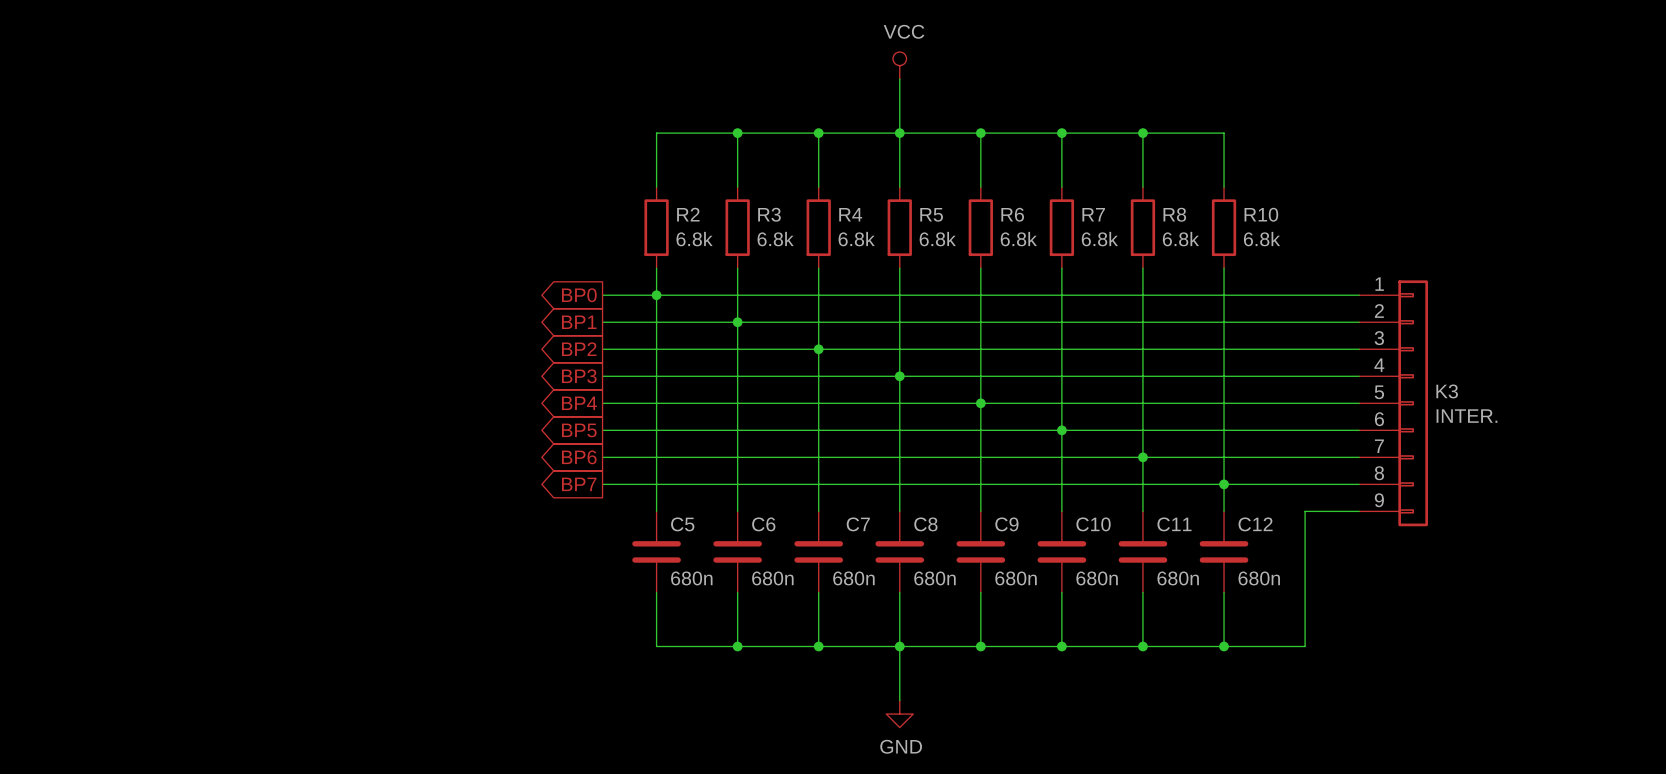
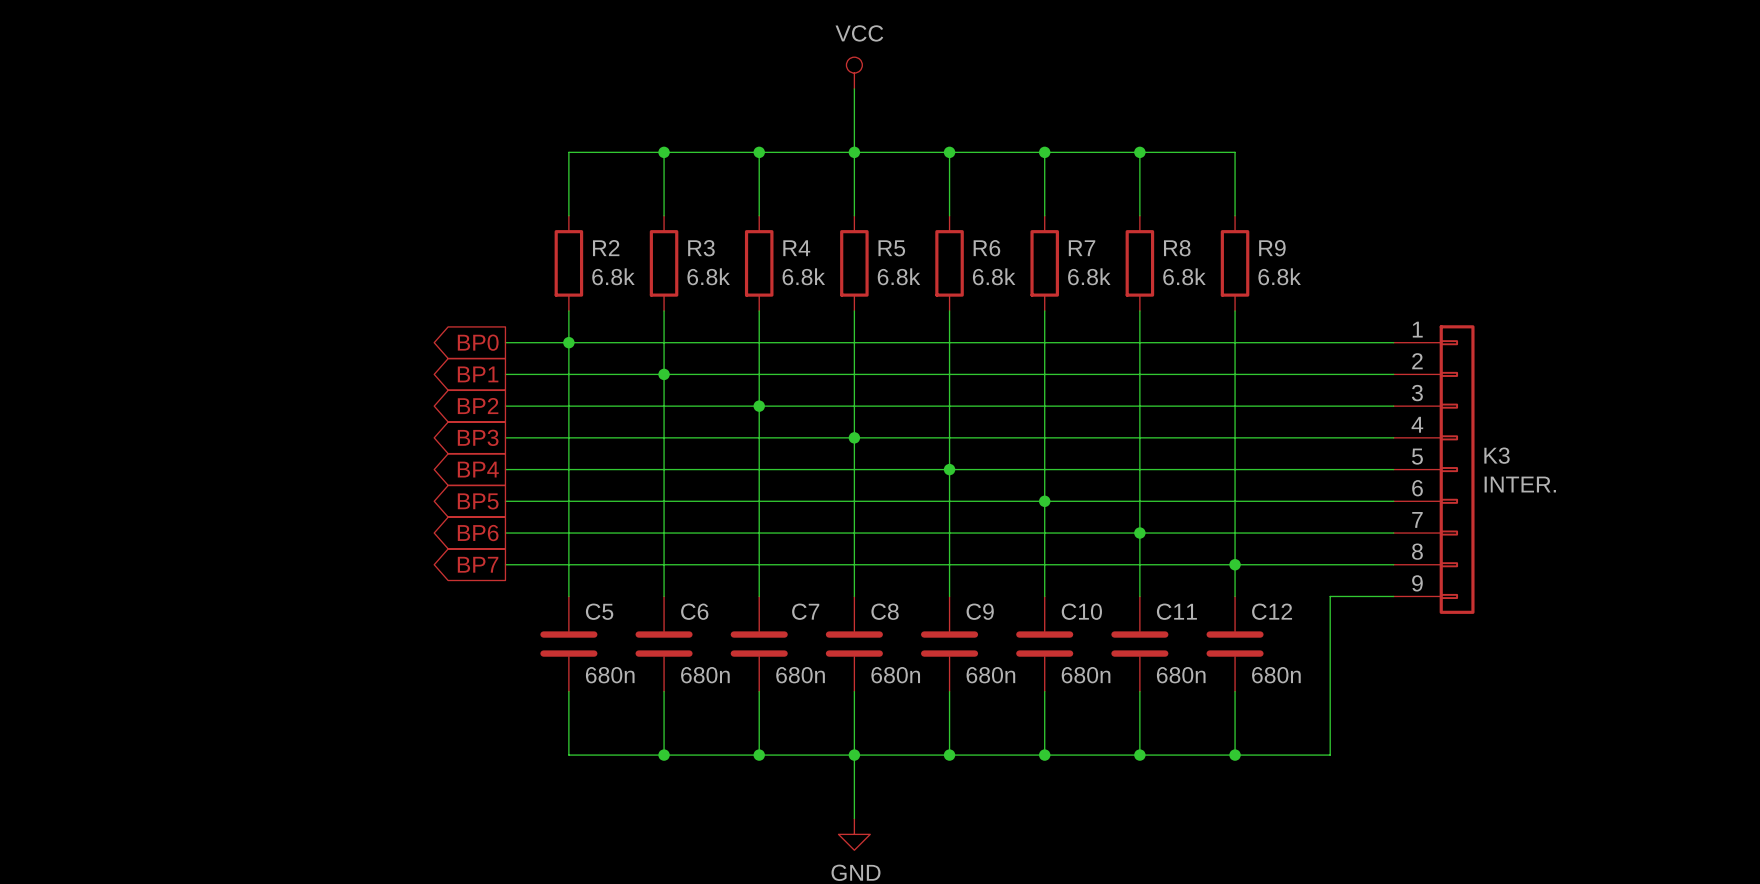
R10 name: R10 (1261, 214) -> R9 (1272, 248)

